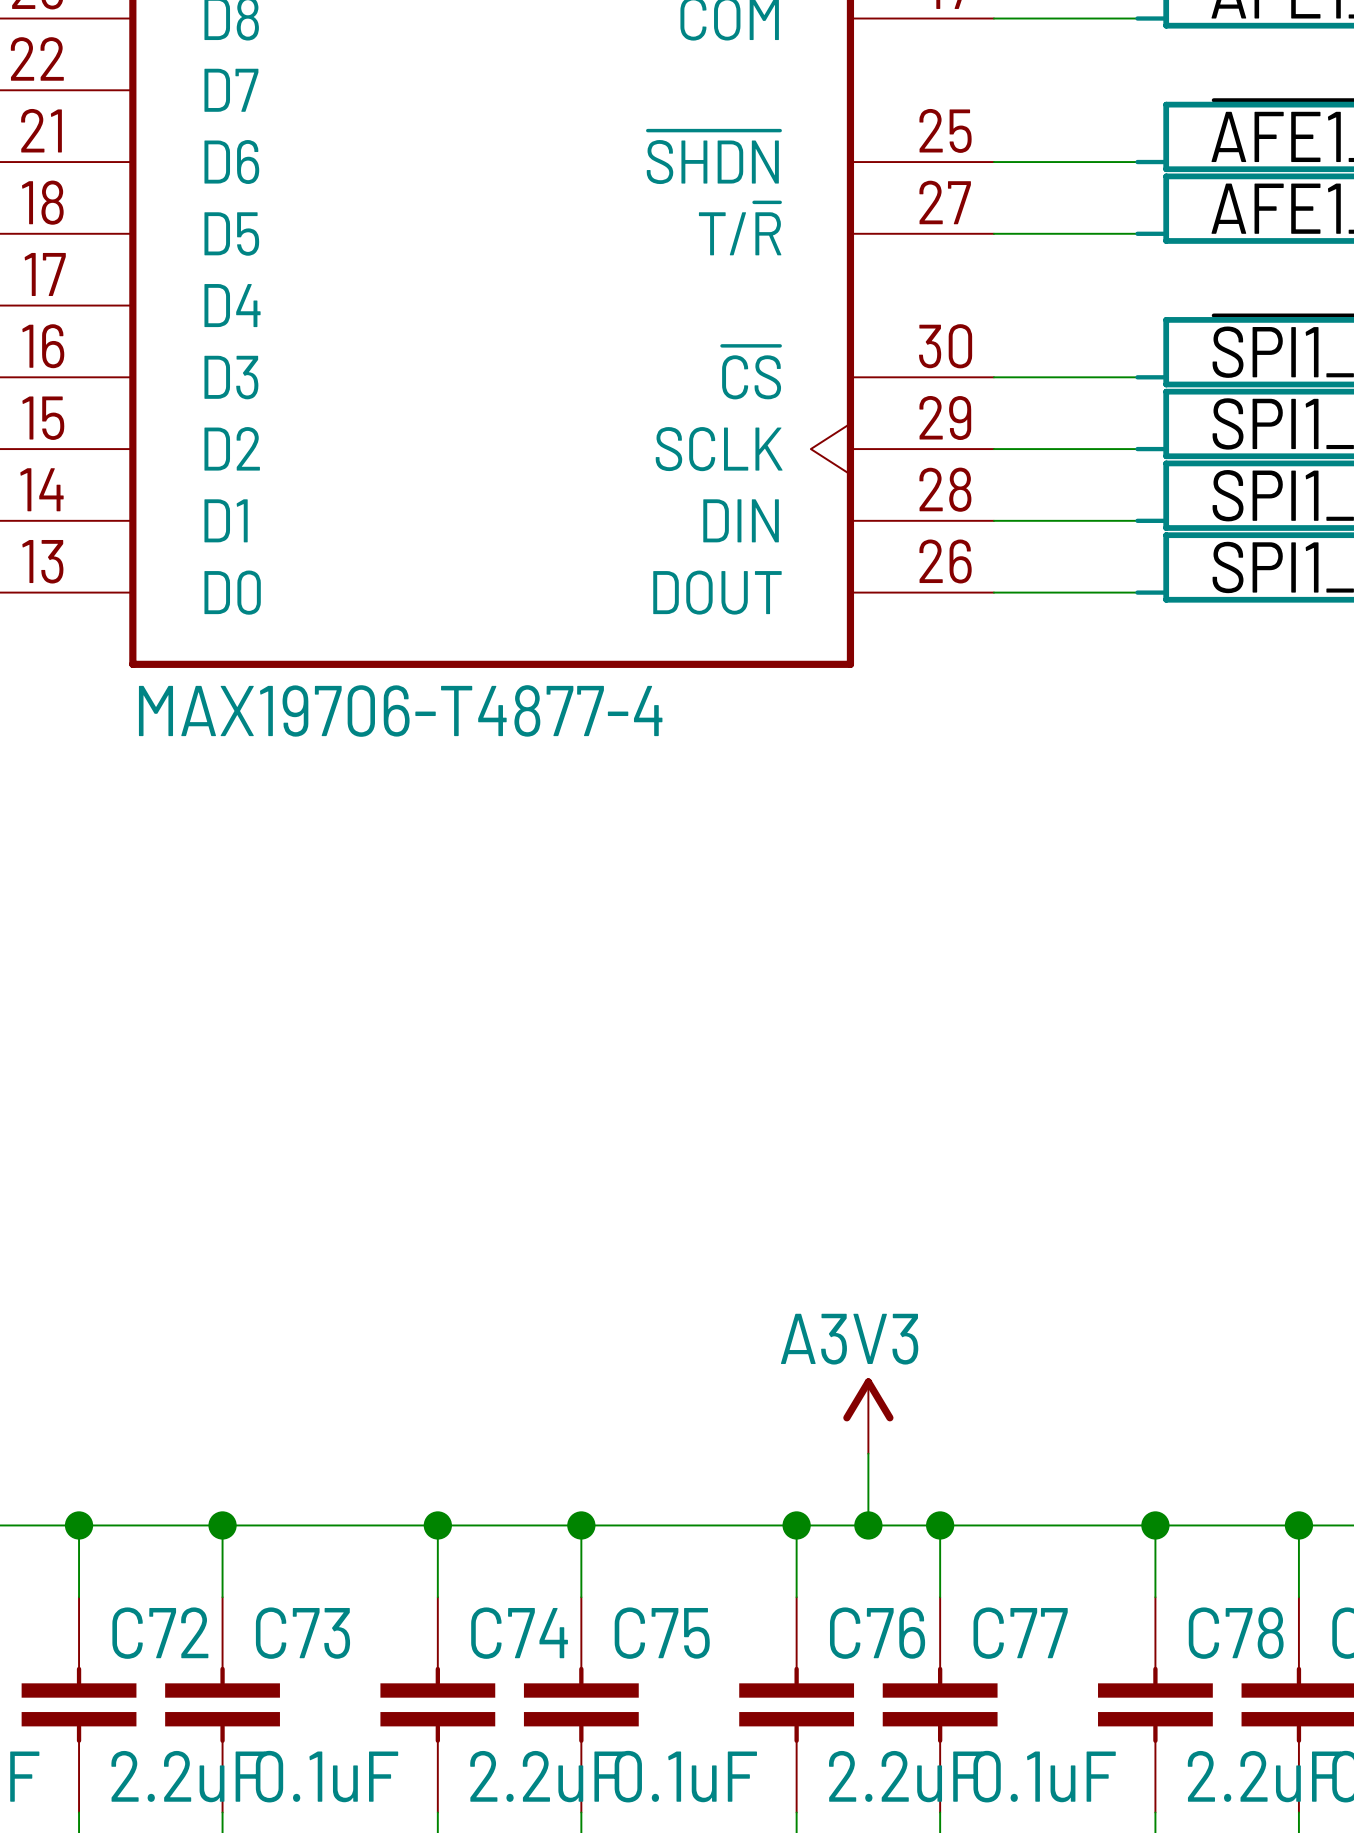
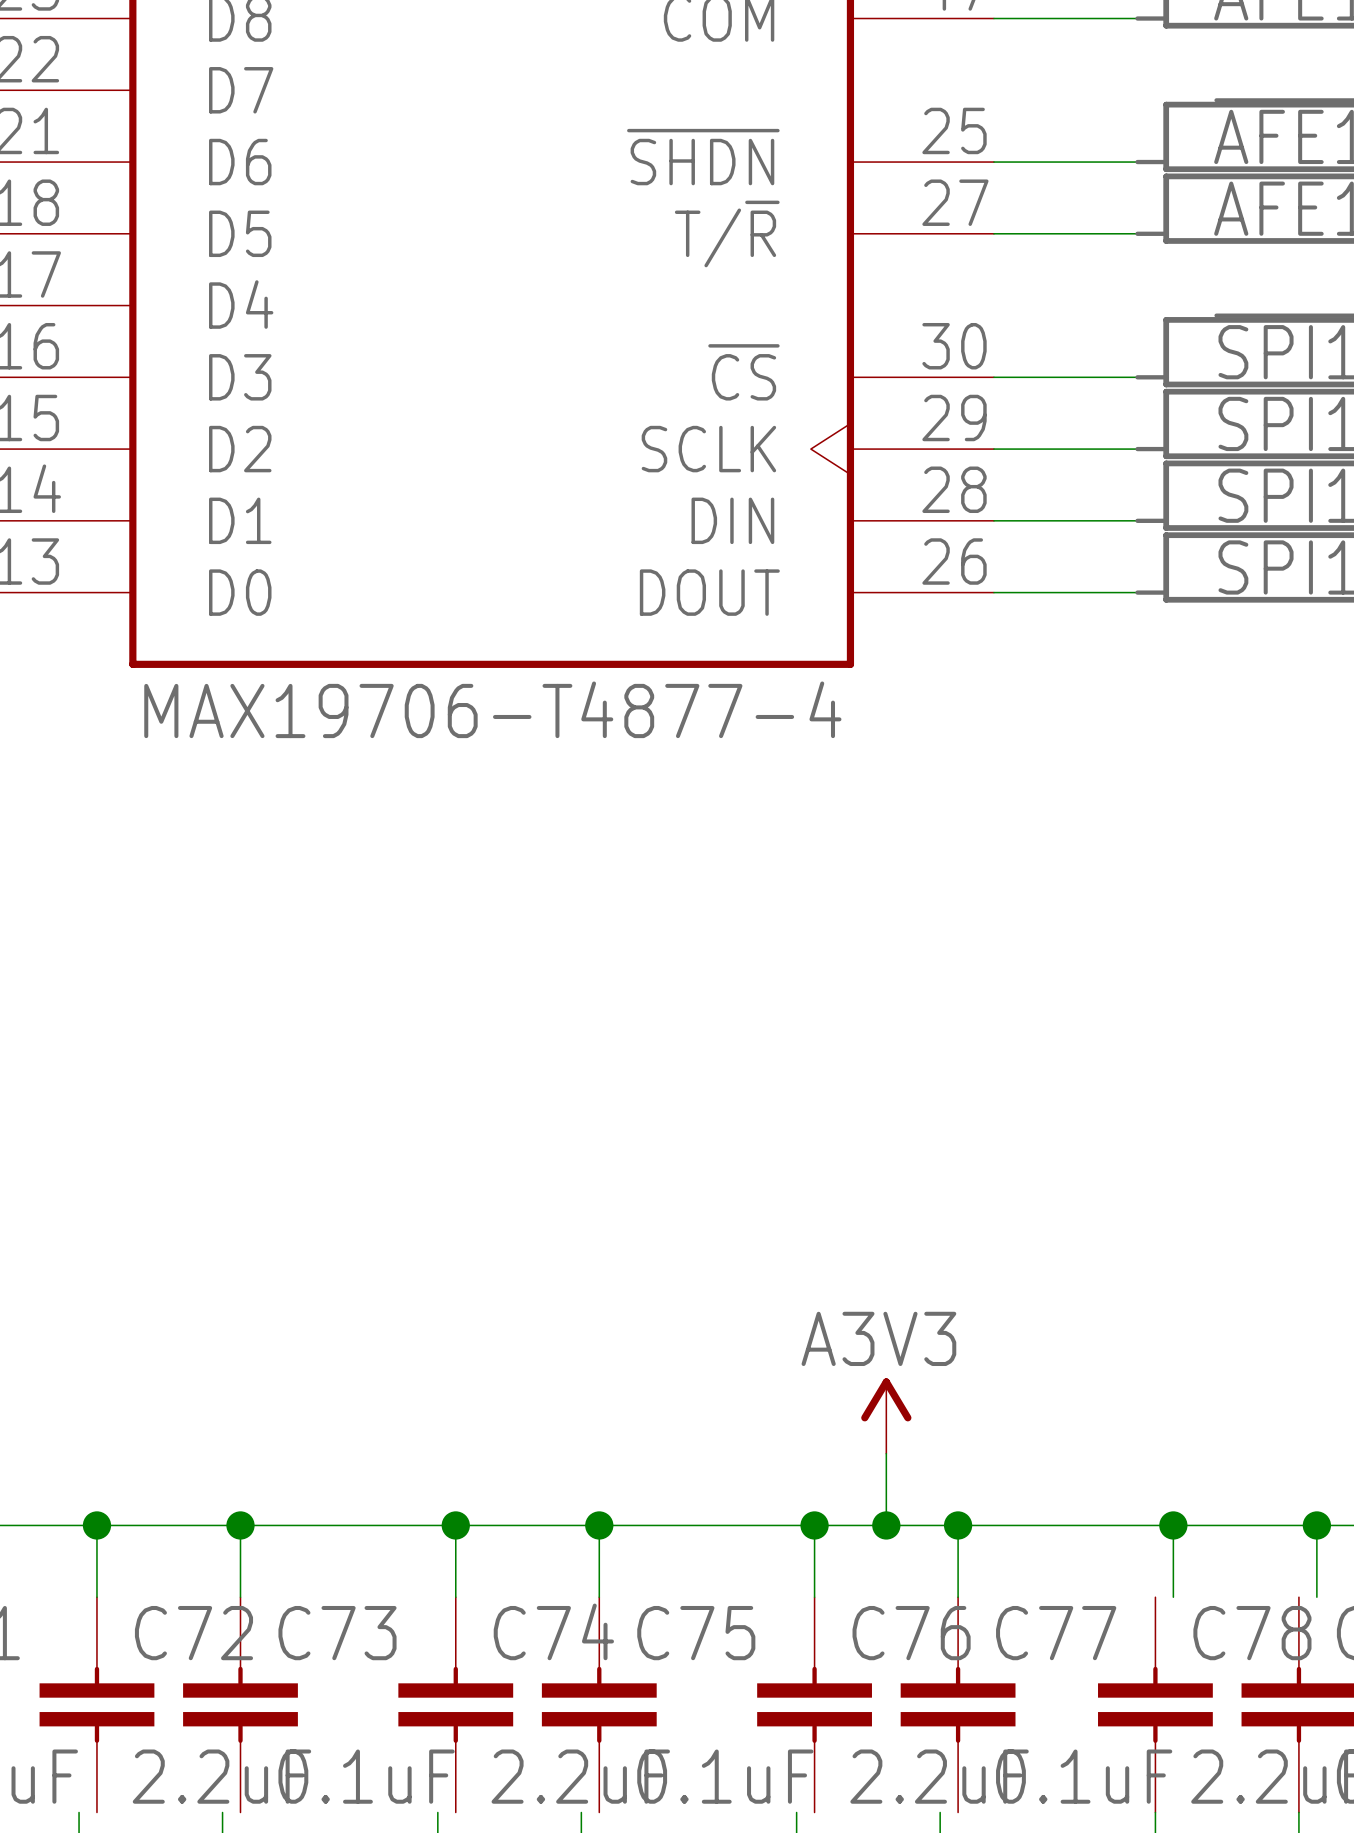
power symbol position: A3V3 (868, 1416) -> A3V3 (886, 1416)
wire: (868, 1453) (868, 1525) -> (886, 1453) (886, 1525)
wire: (79, 1525) (79, 1597) -> (96, 1525) (96, 1597)
junction position: (79, 1525) -> (96, 1525)
wire: (222, 1525) (222, 1597) -> (240, 1525) (240, 1597)
junction position: (222, 1525) -> (240, 1525)
wire: (437, 1525) (437, 1597) -> (455, 1525) (455, 1597)
junction position: (437, 1525) -> (455, 1525)
wire: (581, 1525) (581, 1597) -> (599, 1525) (599, 1597)
junction position: (581, 1525) -> (599, 1525)
wire: (796, 1525) (796, 1597) -> (814, 1525) (814, 1597)
junction position: (796, 1525) -> (814, 1525)
junction position: (868, 1525) -> (886, 1525)
wire: (940, 1525) (940, 1597) -> (958, 1525) (958, 1597)
junction position: (940, 1525) -> (958, 1525)
wire: (1155, 1525) (1155, 1597) -> (1173, 1525) (1173, 1597)
junction position: (1155, 1525) -> (1173, 1525)
wire: (1298, 1525) (1298, 1597) -> (1316, 1525) (1316, 1597)
junction position: (1298, 1525) -> (1316, 1525)
C72 position: (79, 1704) -> (96, 1704)
C73 position: (222, 1704) -> (240, 1704)
C74 position: (437, 1704) -> (455, 1704)
C75 position: (581, 1704) -> (599, 1704)
C76 position: (796, 1704) -> (814, 1704)
C77 position: (940, 1704) -> (958, 1704)

